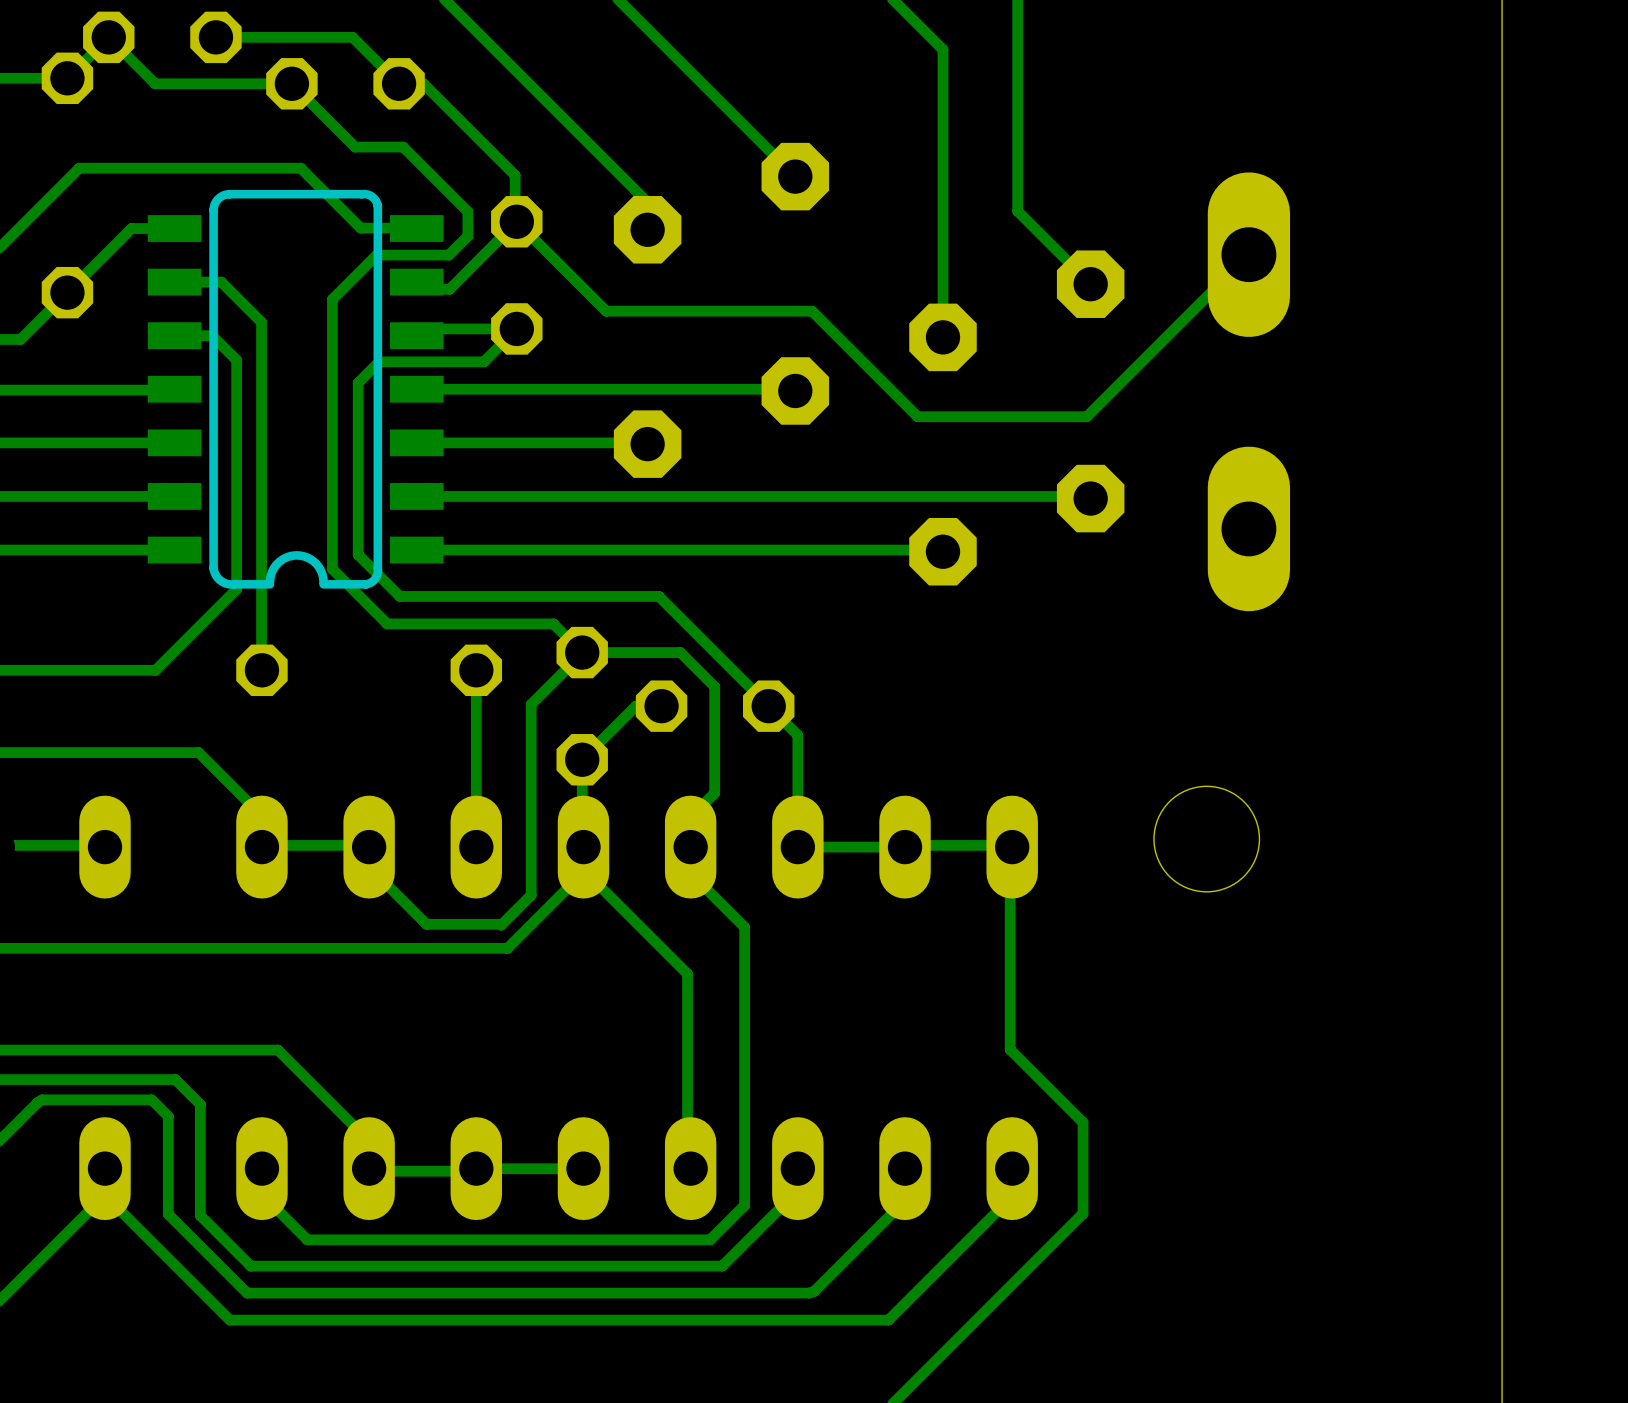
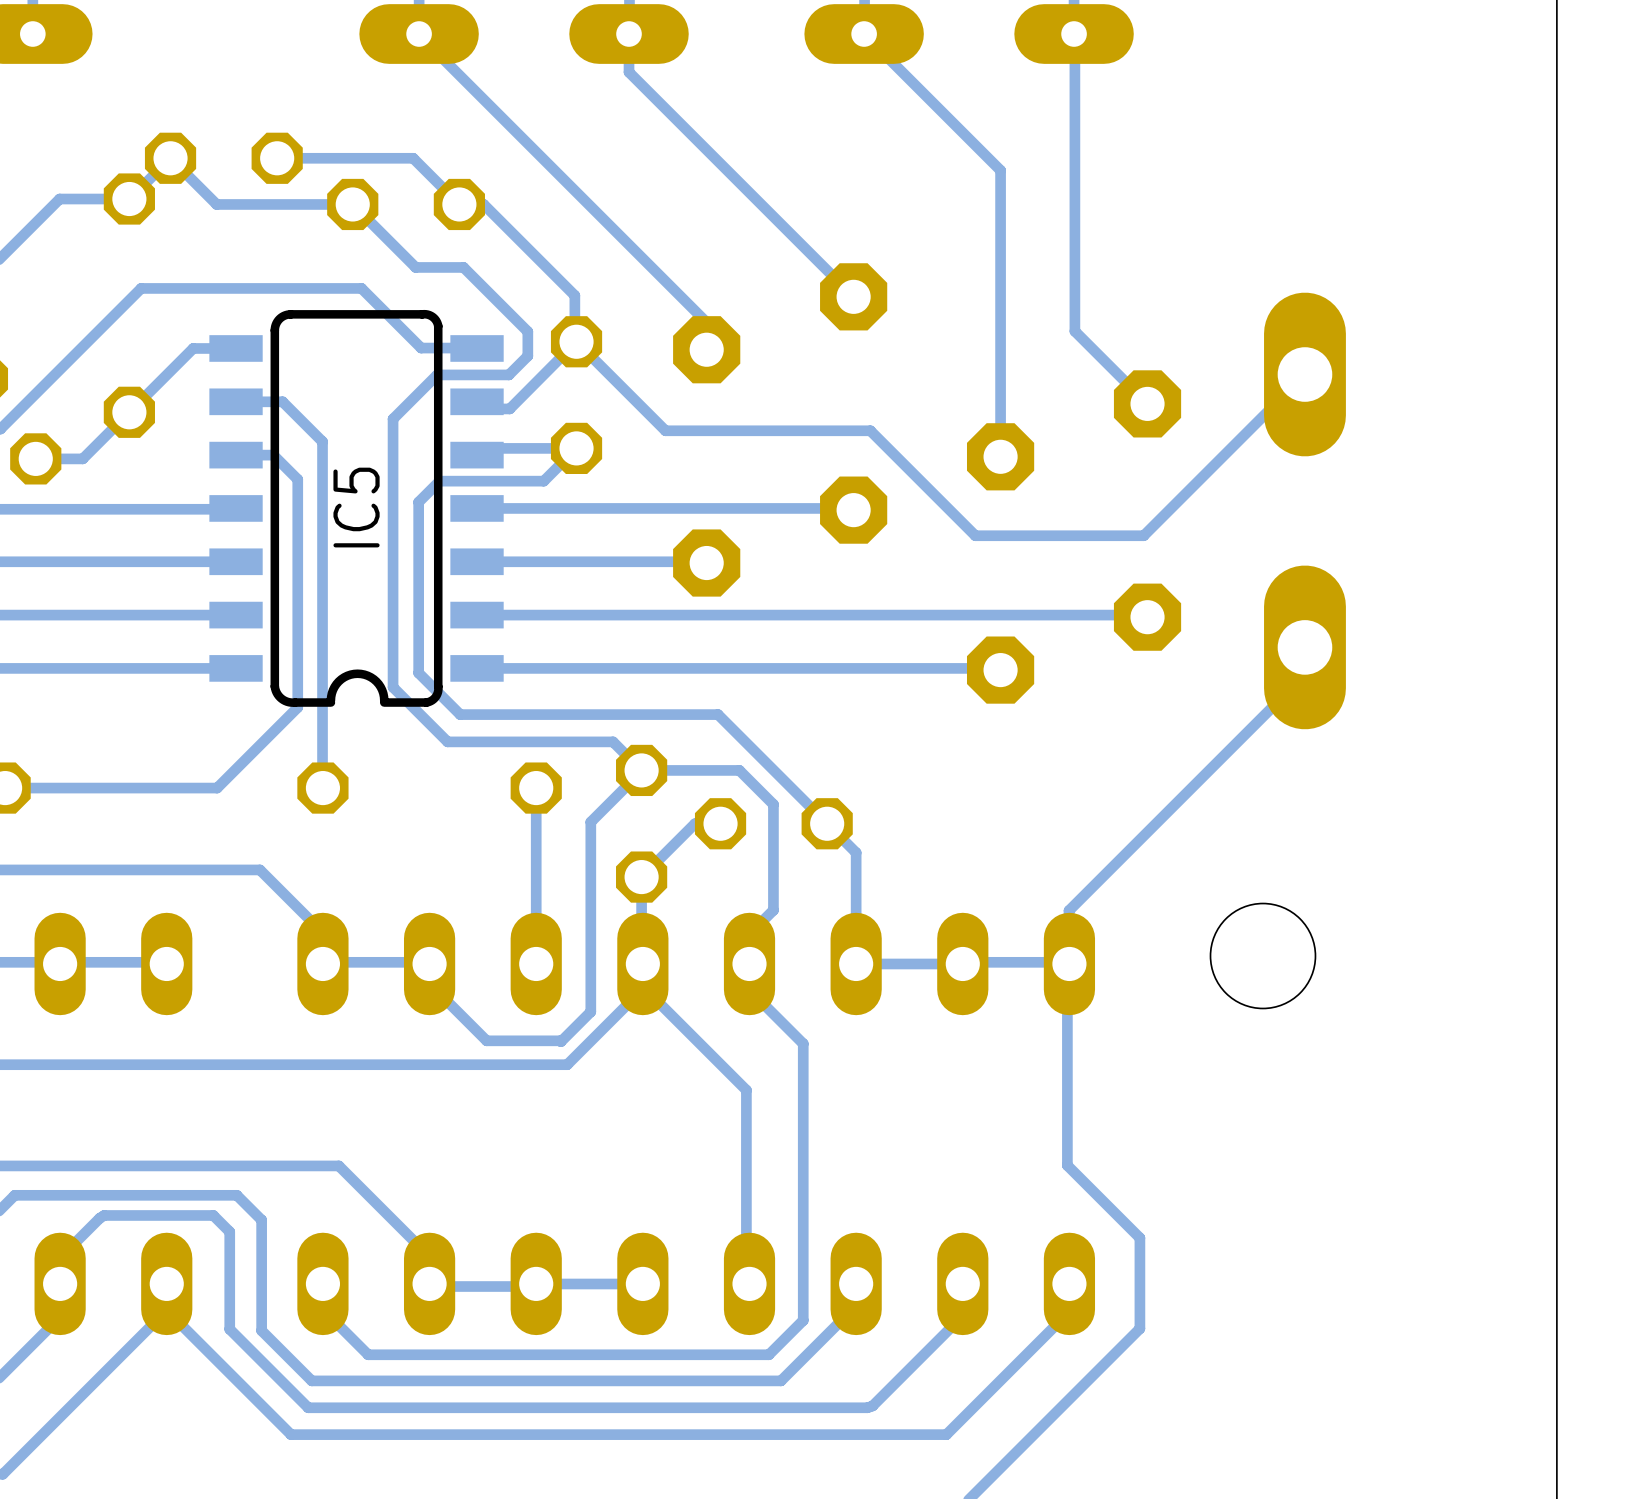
IC5 name: none -> IC5 (356, 507)
track: none -> (1304, 647) (1304, 674) (1069, 910) (1069, 963)

